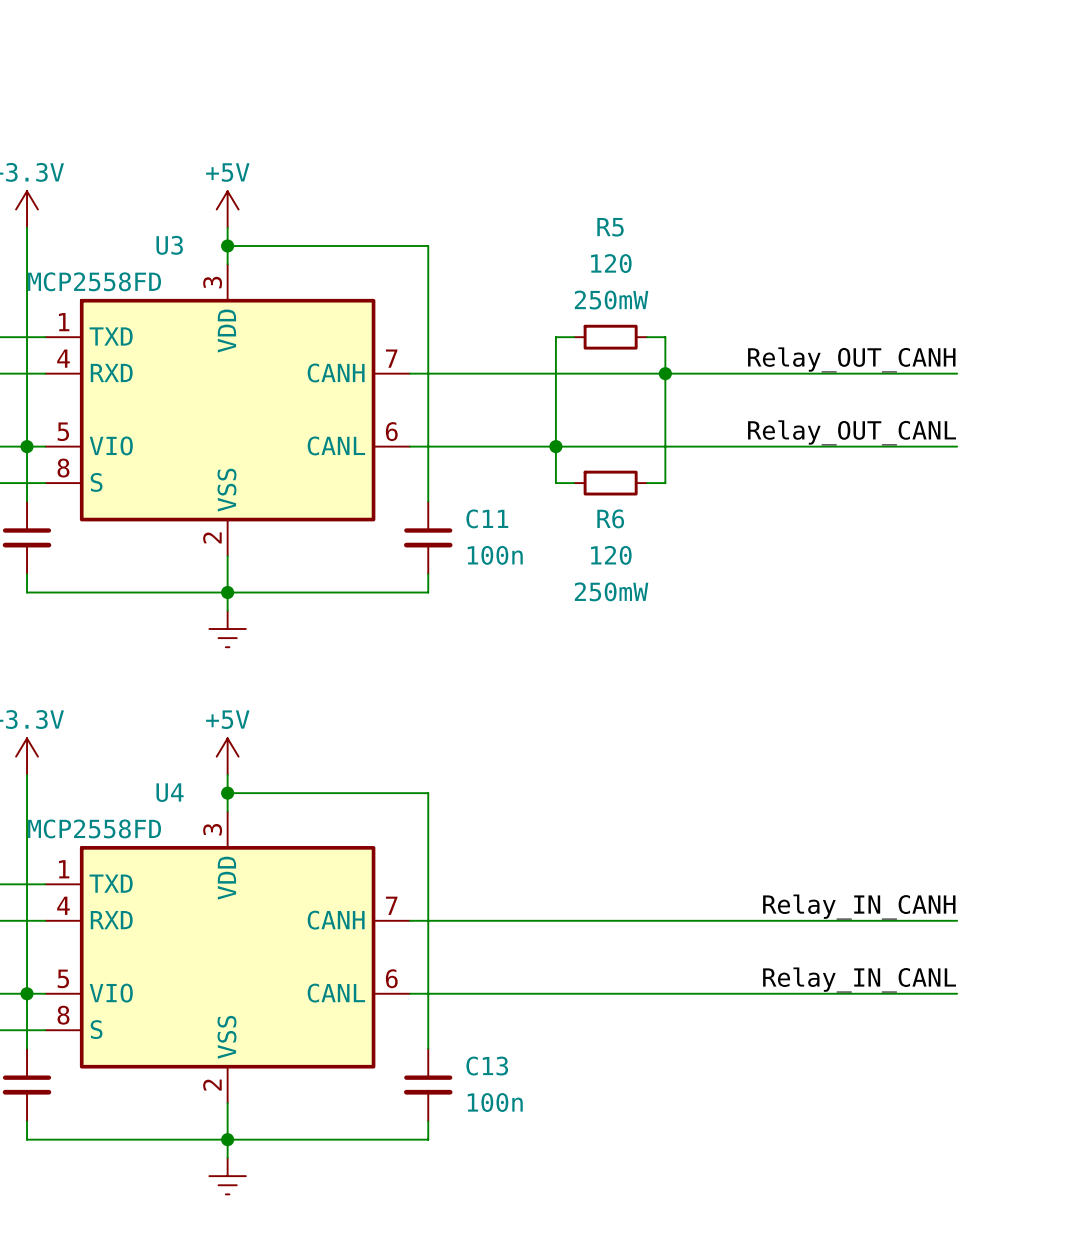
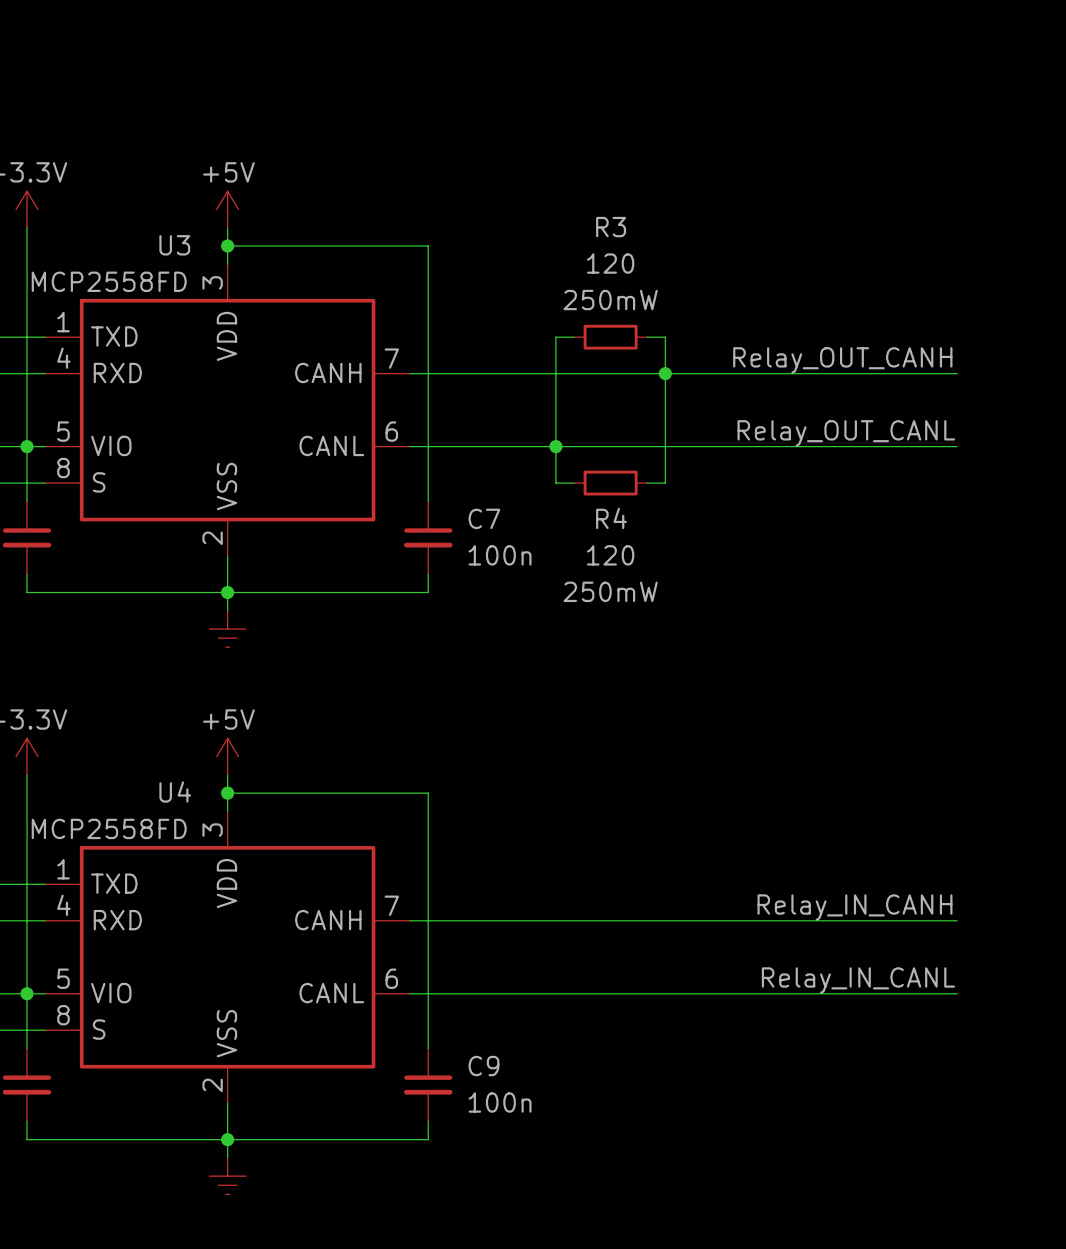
R5 name: R5 (610, 227) -> R3 (611, 227)
C11 name: C11 (487, 518) -> C7 (484, 518)
R6 name: R6 (610, 518) -> R4 (611, 518)
C13 name: C13 (487, 1066) -> C9 (483, 1066)

